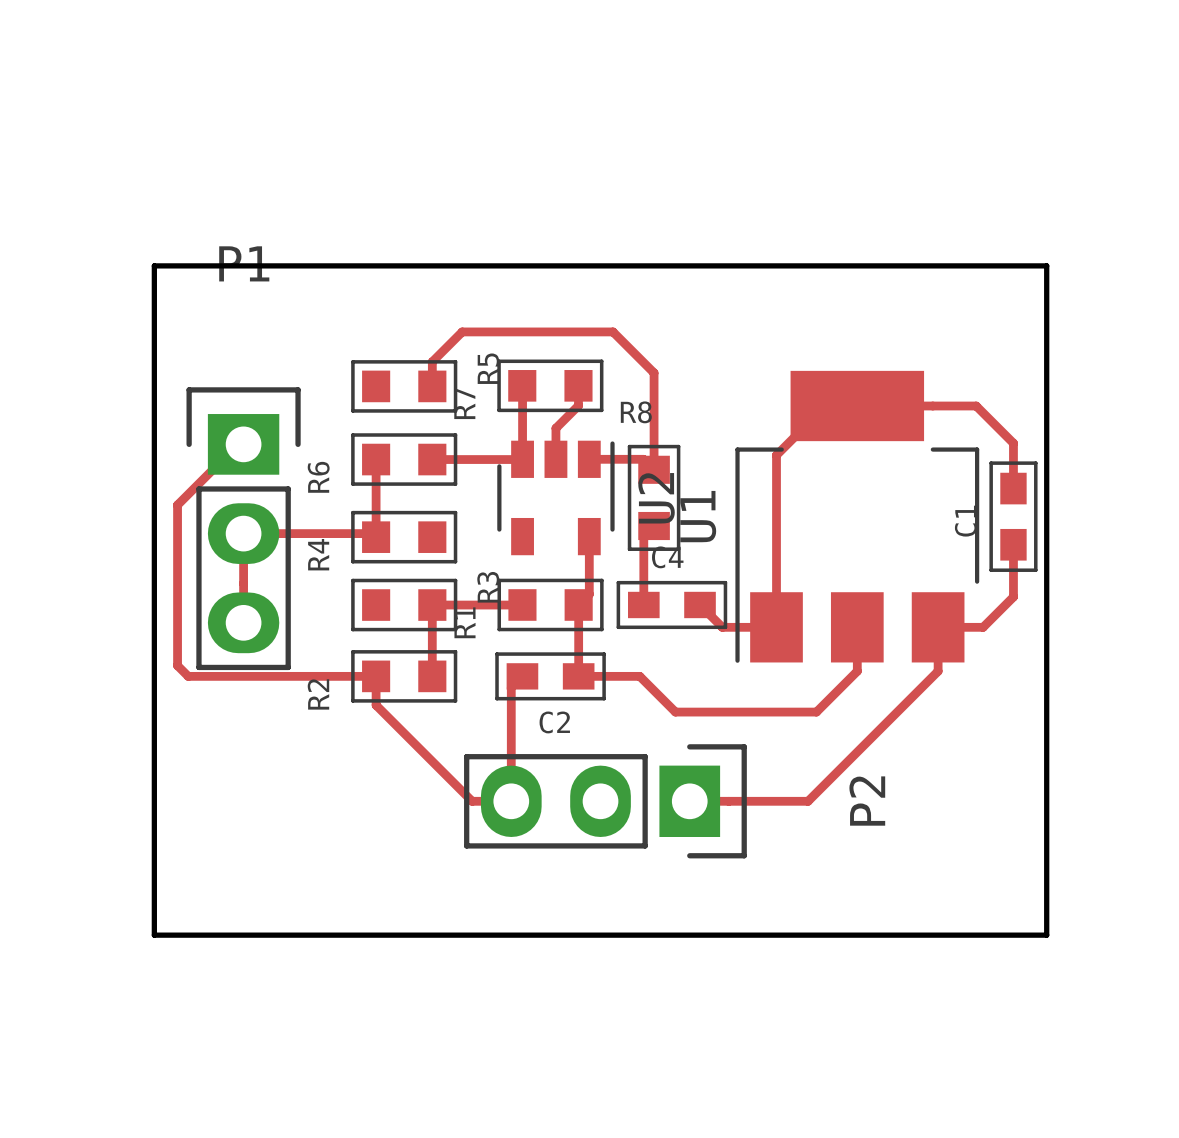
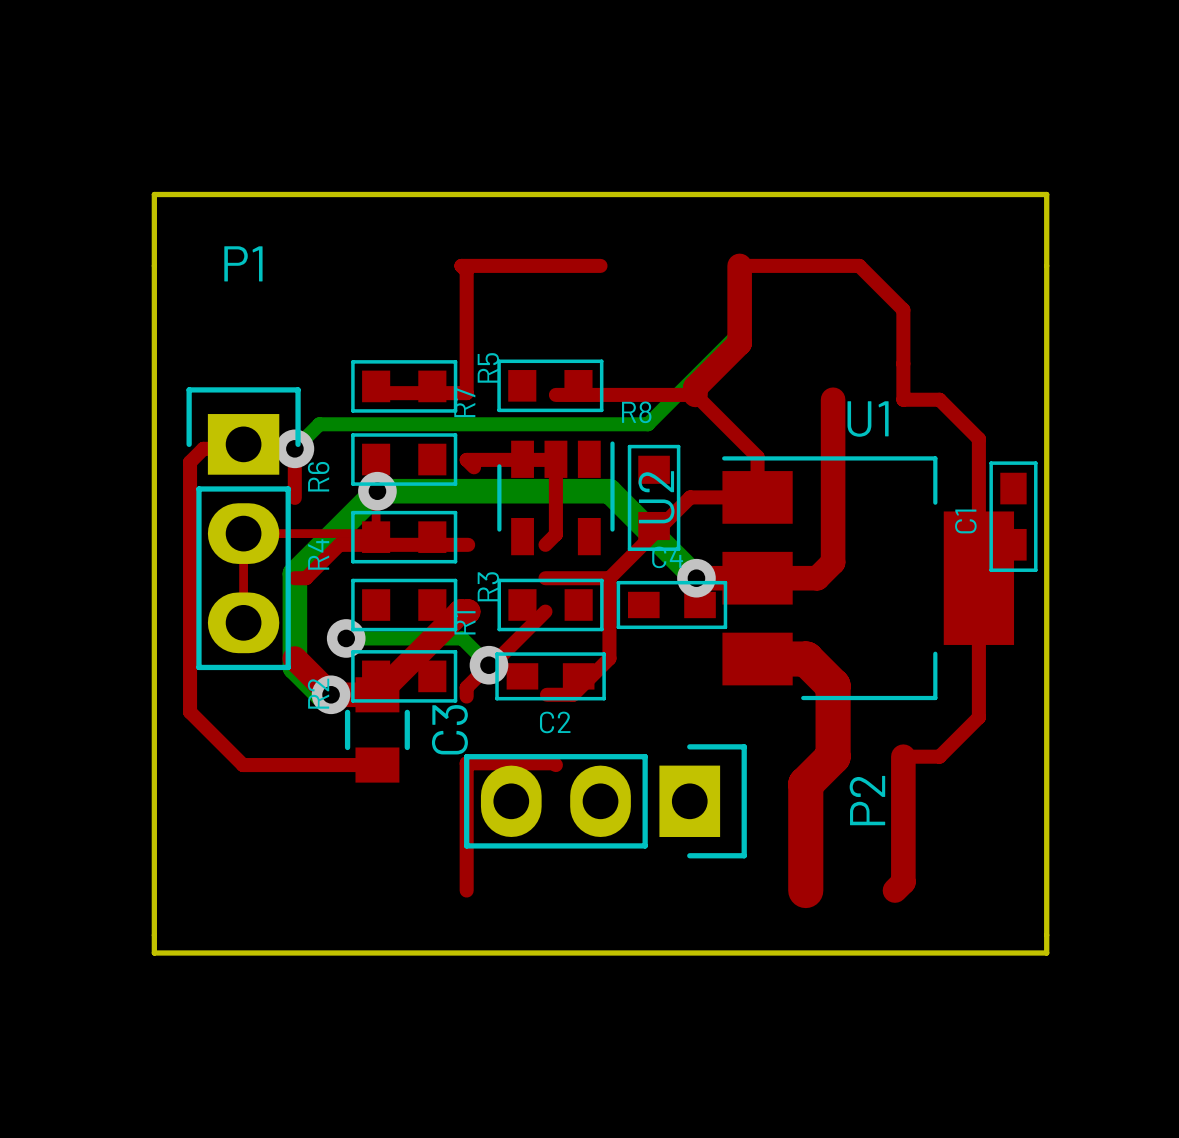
board edge: (154, 265) (1046, 265) -> (154, 265) (154, 194) (1046, 194) (1046, 265)
top track: none -> (600, 265) (461, 265) (466, 271) (466, 393) (377, 393)
bottom track: none -> (739, 265) (739, 332) (648, 424) (319, 424) (294, 448)
top track: (578, 385) (578, 405) (555, 428) (555, 459) -> none
top track: (432, 386) (432, 361) (462, 331) (613, 331) (654, 372) (654, 469) (643, 459) (589, 459) -> none
top track: (522, 386) (522, 459) -> none
top track: none -> (555, 394) (695, 394)
top track: none -> (695, 394) (757, 457) (757, 497) (690, 497) (609, 578)
top track: none -> (695, 394) (695, 387) (739, 343) (739, 265) (859, 265) (903, 309) (903, 399) (939, 399) (978, 439) (978, 717) (939, 756) (903, 756) (903, 882) (895, 890)
top track: none -> (833, 399) (833, 562) (817, 578) (696, 578)
top track: (243, 444) (238, 444) (177, 505) (177, 665) (188, 676) (376, 676) (376, 705) (472, 801) (511, 801) (511, 687) (522, 676) -> none
via: none -> (294, 448)
top track: (432, 459) (522, 459) -> none
top track: none -> (474, 467) (466, 459) (554, 459) (555, 461) (555, 534) (545, 544)
top track: (1013, 488) (1013, 443) (976, 406) (825, 406) (776, 455) (776, 627) (722, 627) (700, 604) -> none
via: none -> (377, 491)
top track: none -> (294, 497) (294, 448) (203, 448) (190, 462) (190, 712) (243, 765) (377, 765)
U1 rotation: 0° (857, 516) -> 90° clockwise (868, 578)
top track: (654, 526) (643, 536) (643, 604) -> none
top track: (589, 536) (589, 594) (578, 604) (578, 676) (639, 676) (675, 712) (816, 712) (857, 671) (857, 627) -> none
top track: none -> (468, 544) (339, 544) (306, 578) (294, 578)
top track: (1013, 544) (1013, 596) (983, 627) (938, 627) (938, 671) (808, 801) (689, 801) -> none
top track: none -> (545, 578) (609, 578)
top track: none -> (609, 578) (609, 658) (573, 694) (546, 694)
bottom track: none -> (696, 578) (609, 491) (377, 491) (294, 573) (294, 667) (322, 694) (331, 694)
via: none -> (696, 578)
top track: (522, 605) (432, 605) (432, 676) -> none
top track: none -> (468, 611) (460, 611) (377, 694) (331, 694) (294, 658)
top track: none -> (545, 611) (466, 687) (466, 696)
bottom track: none -> (346, 638) (462, 638) (488, 665)
via: none -> (346, 638)
top track: none -> (757, 659) (806, 659) (833, 685) (833, 756) (805, 784) (805, 890)
via: none -> (488, 665)
via: none -> (331, 694)
C3: none -> (377, 729)
top track: none -> (555, 765) (554, 763) (466, 763) (466, 890)
board edge: (154, 935) (1046, 935) -> (154, 935) (154, 953) (1046, 953) (1046, 935)

